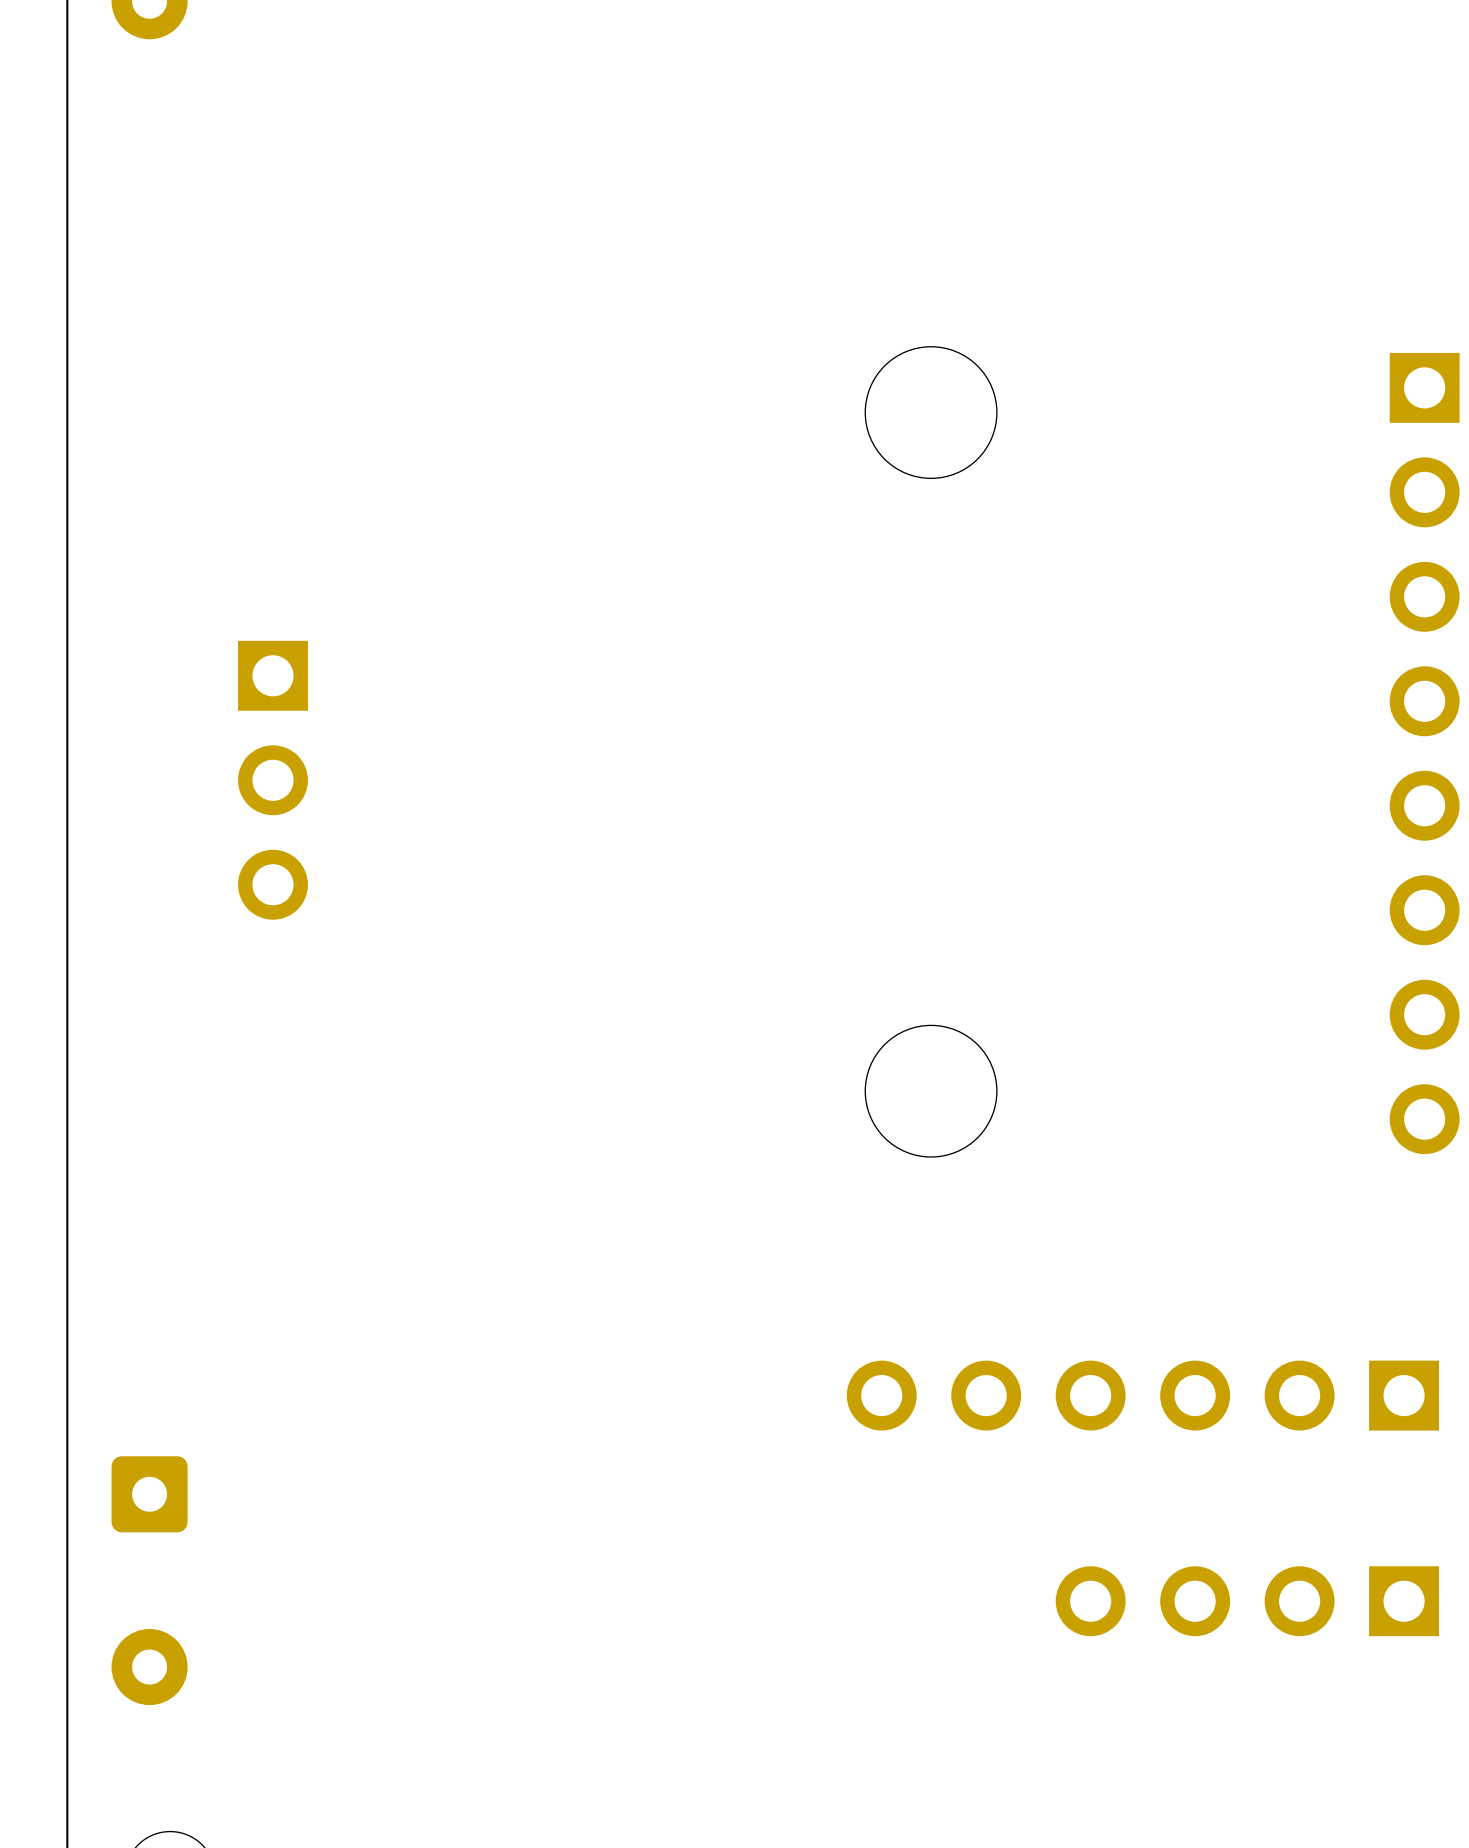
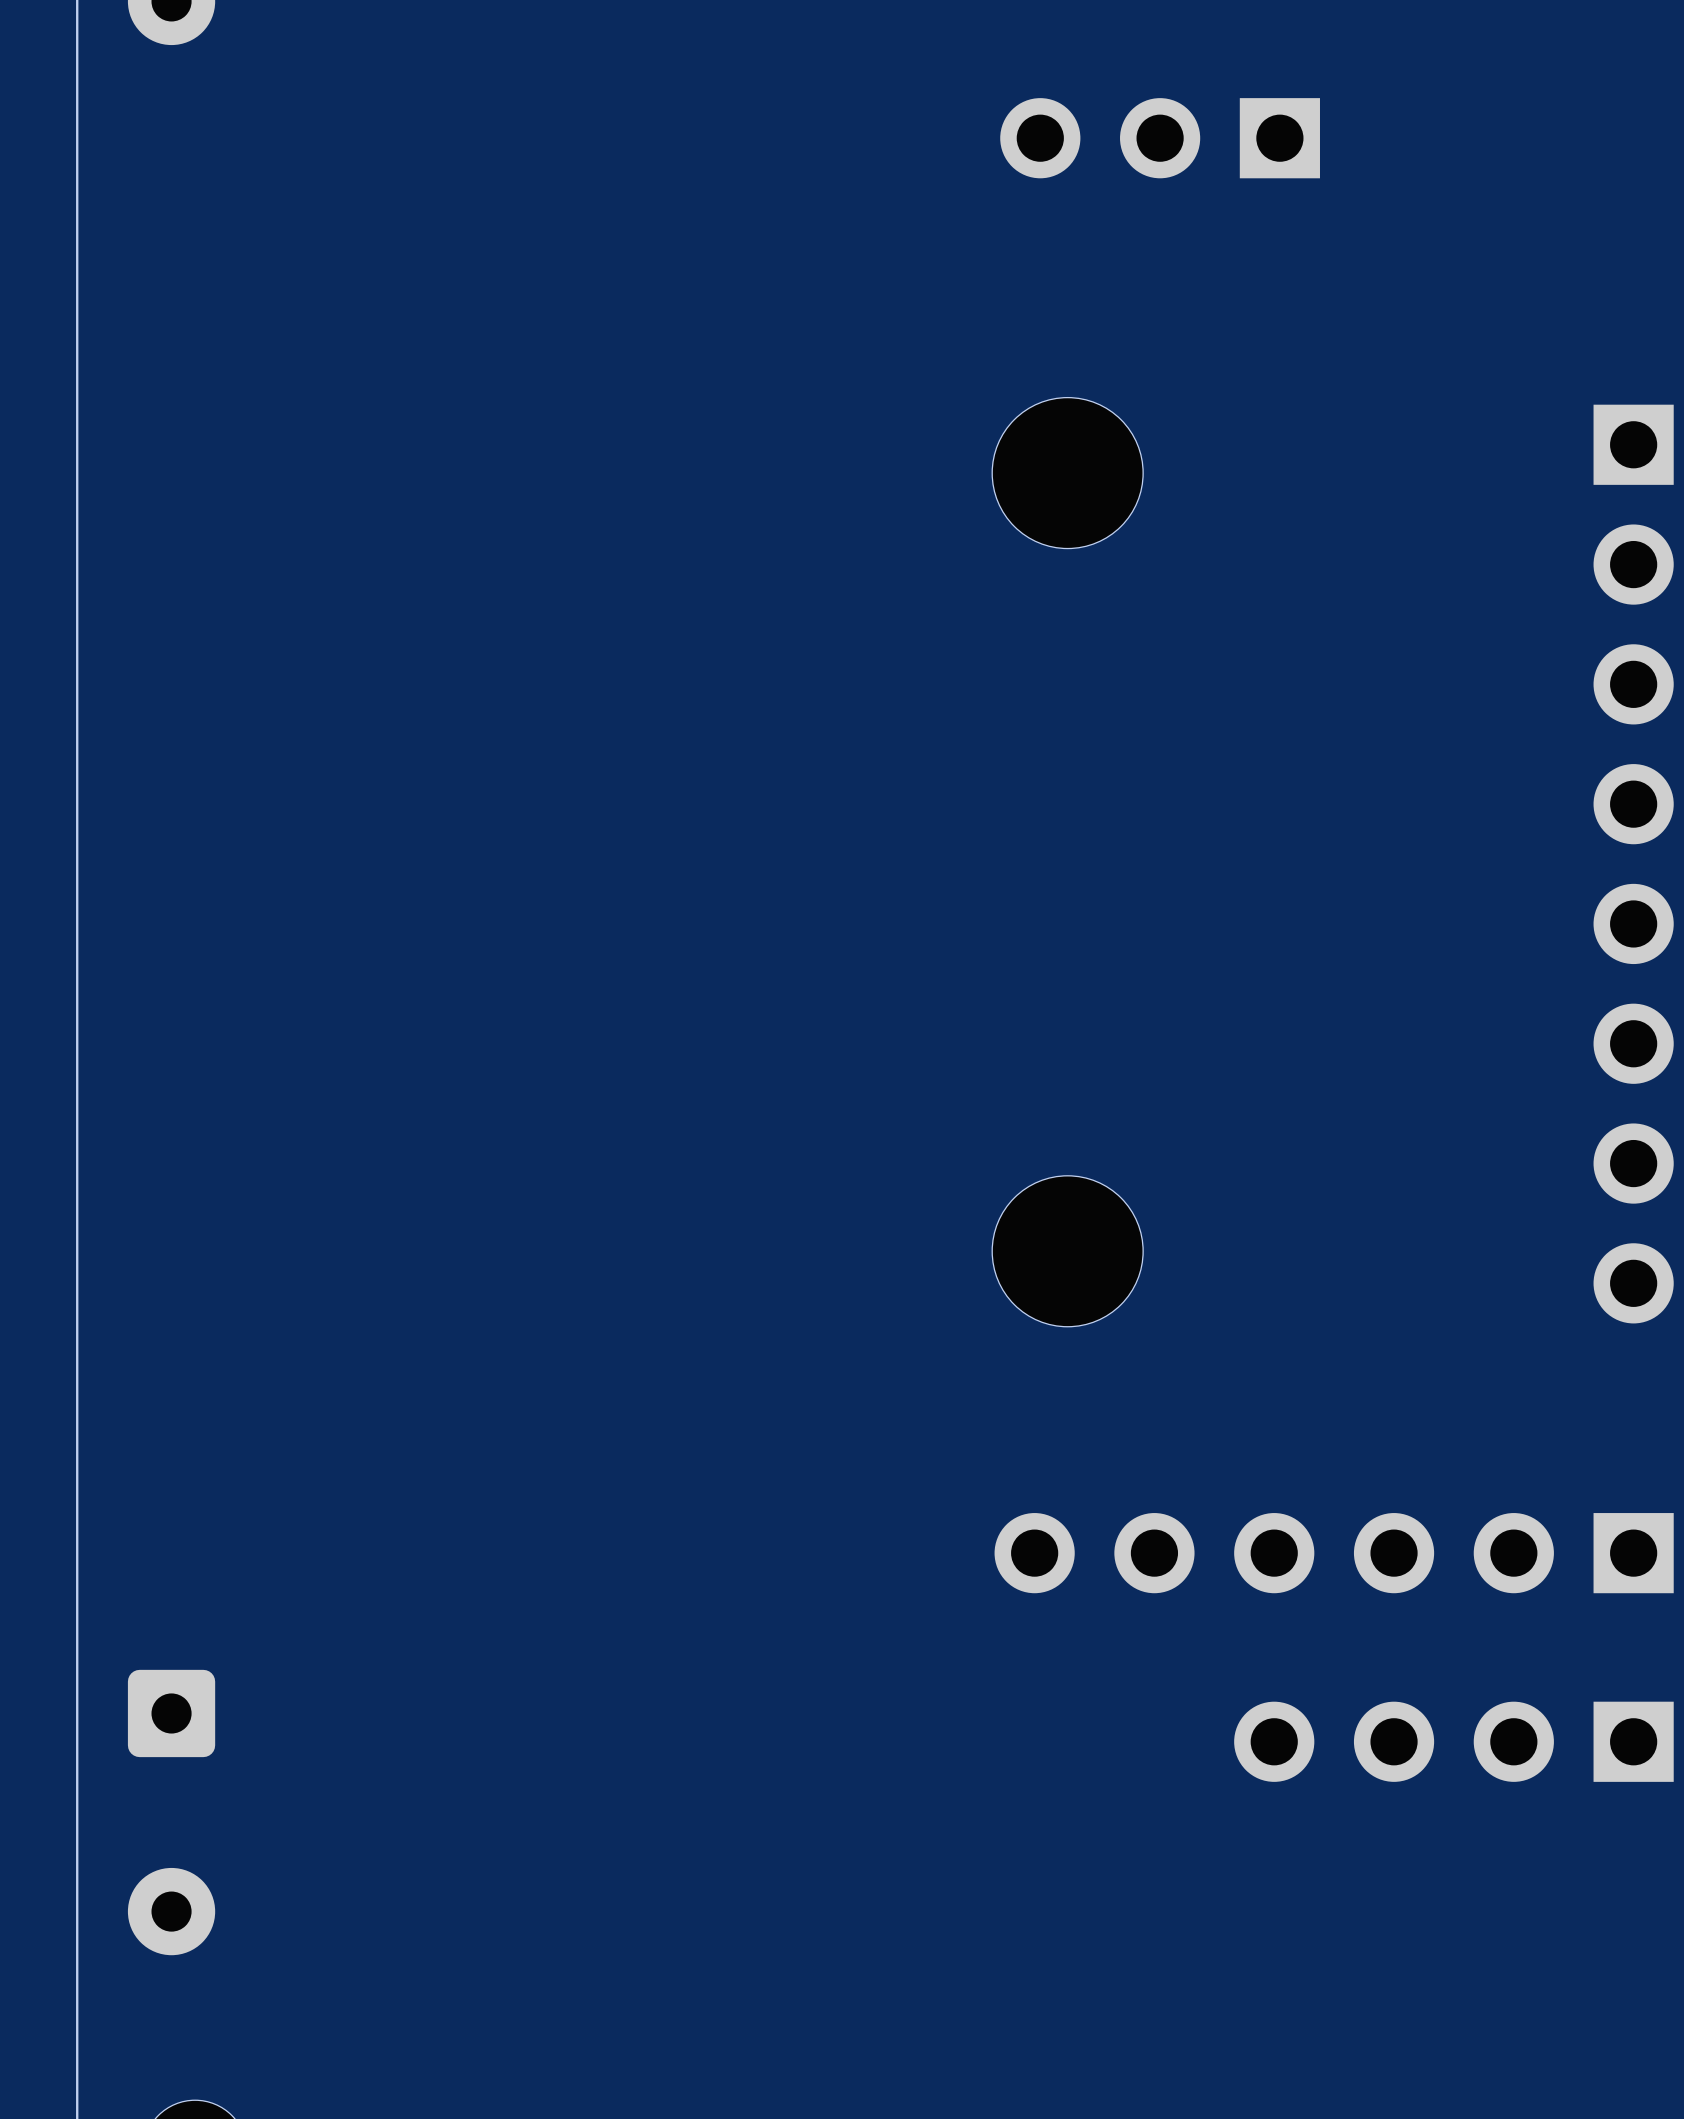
part rotation: 0° (272, 780) -> 90° clockwise (1160, 138)
part position: (272, 780) -> (1160, 138)
part position: (1142, 1395) -> (1334, 1553)
part position: (1247, 1601) -> (1453, 1741)

